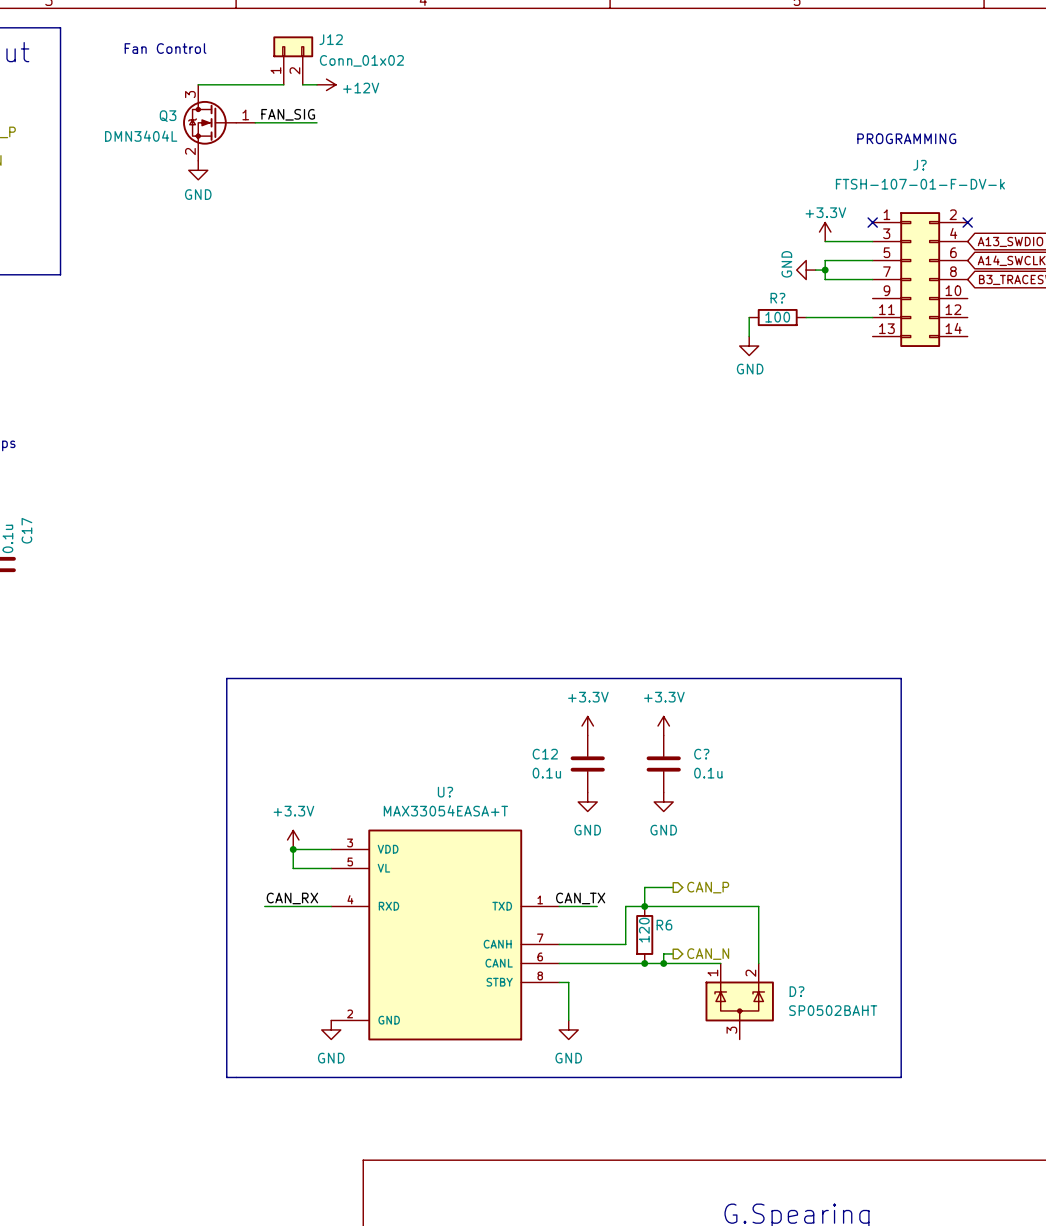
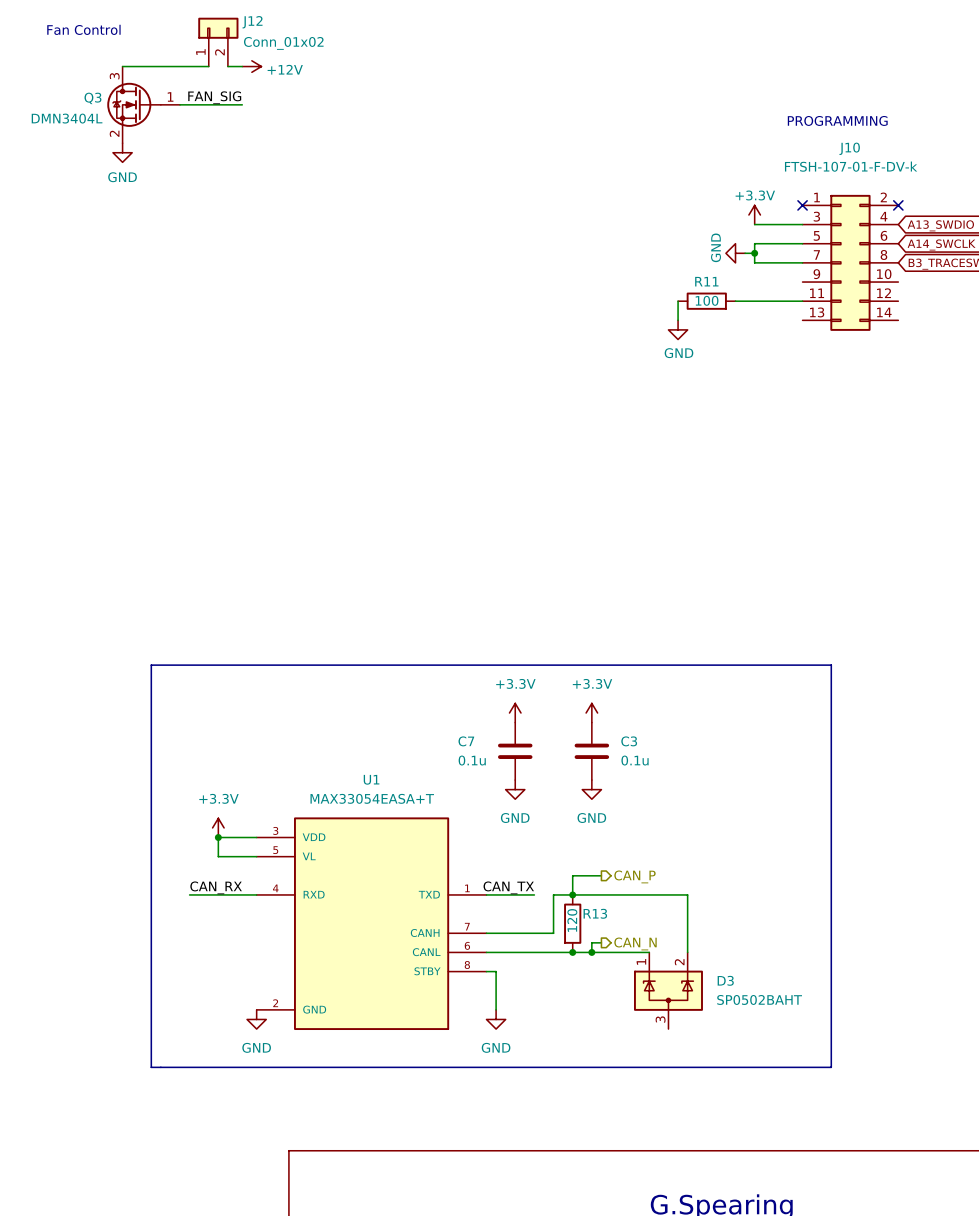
J? name: J? (919, 165) -> J10 (849, 148)
R? name: R? (777, 298) -> R11 (706, 281)
C12 name: C12 (545, 754) -> C7 (466, 741)
C? name: C? (701, 754) -> C3 (629, 741)
U? name: U? (445, 792) -> U1 (371, 779)
wire: none -> (524, 894) (534, 894)
R6 name: R6 (664, 925) -> R13 (595, 913)
D? name: D? (797, 991) -> D3 (725, 980)

